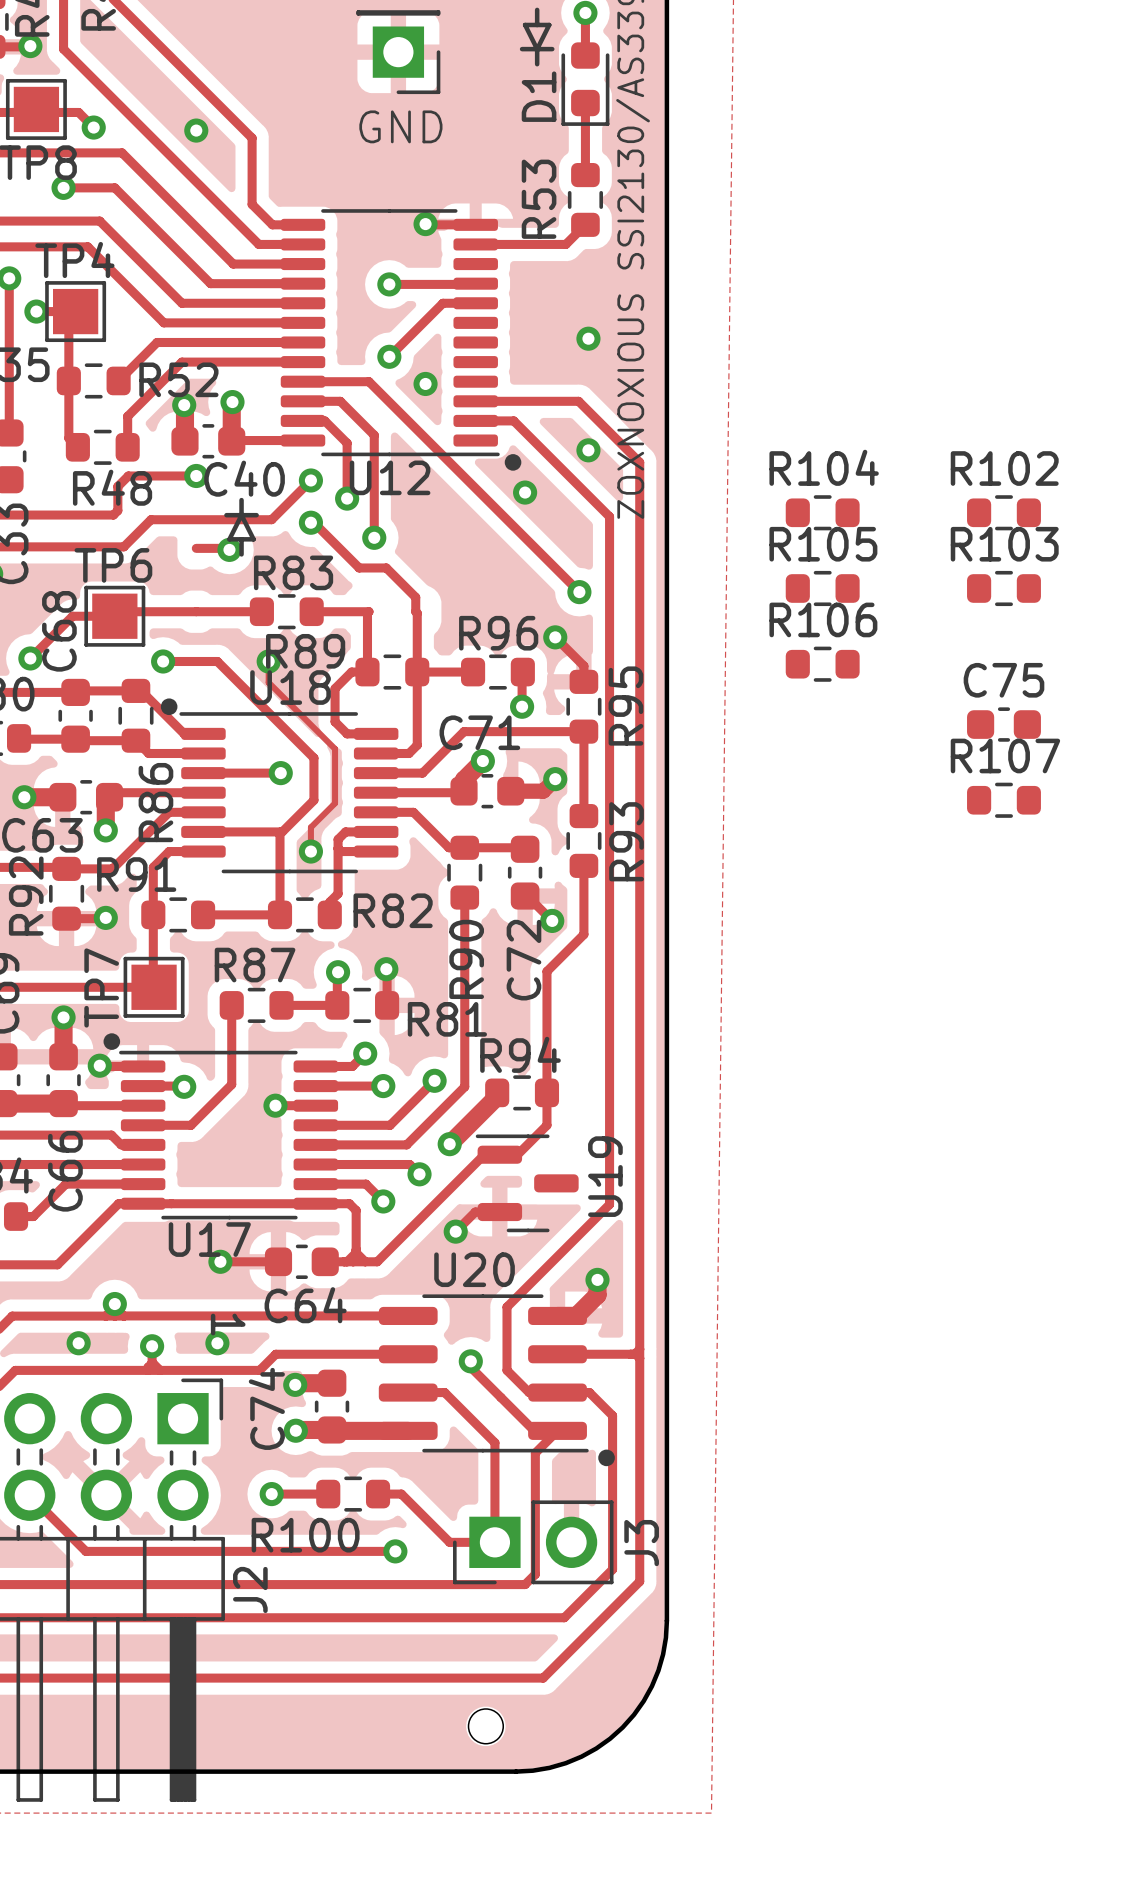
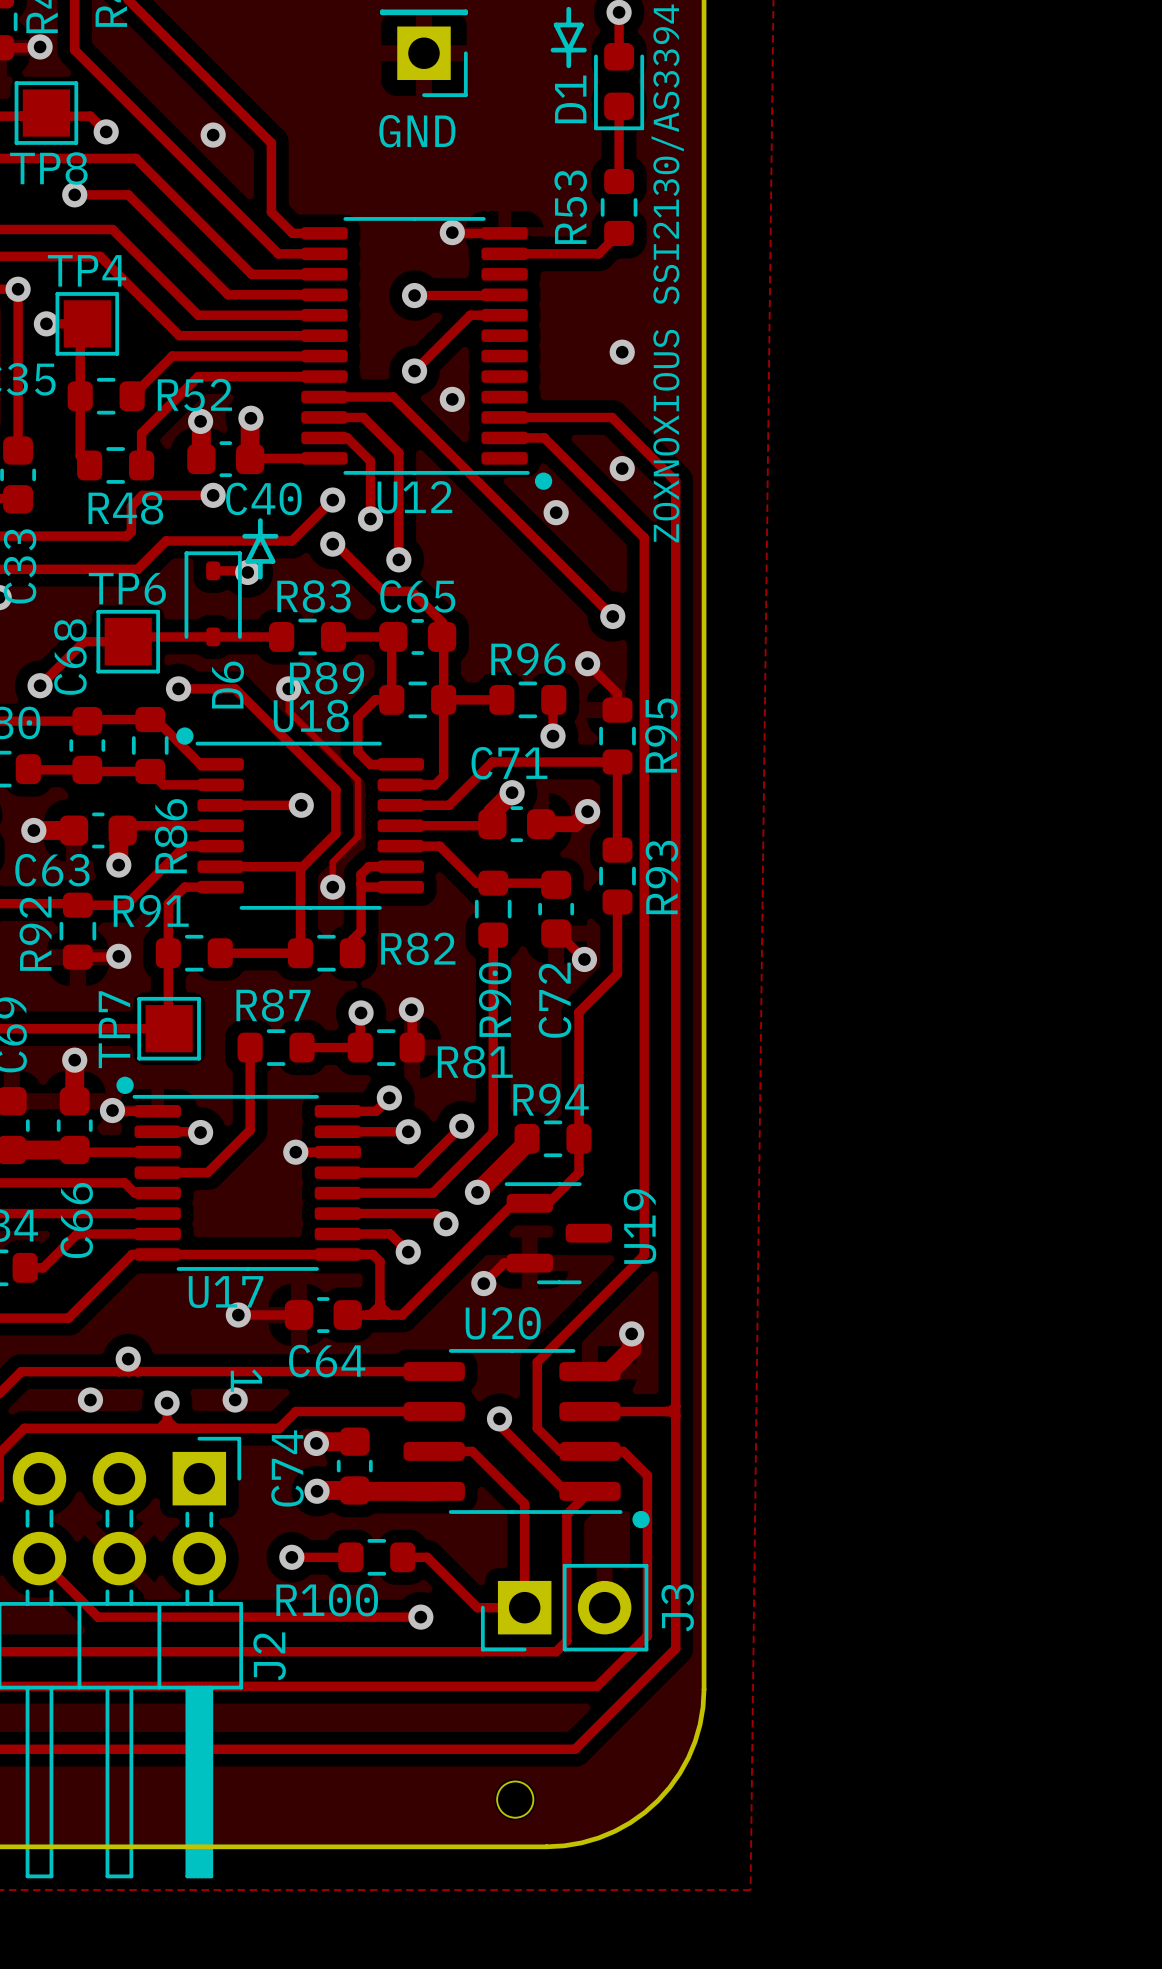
R104: (822, 512) -> none
R102: (1003, 512) -> none
D6: none -> (213, 598)
R105: (822, 588) -> none
R103: (1003, 588) -> none
C65: none -> (417, 636)
R106: (822, 664) -> none
C75: (1003, 724) -> none
R107: (1003, 800) -> none

